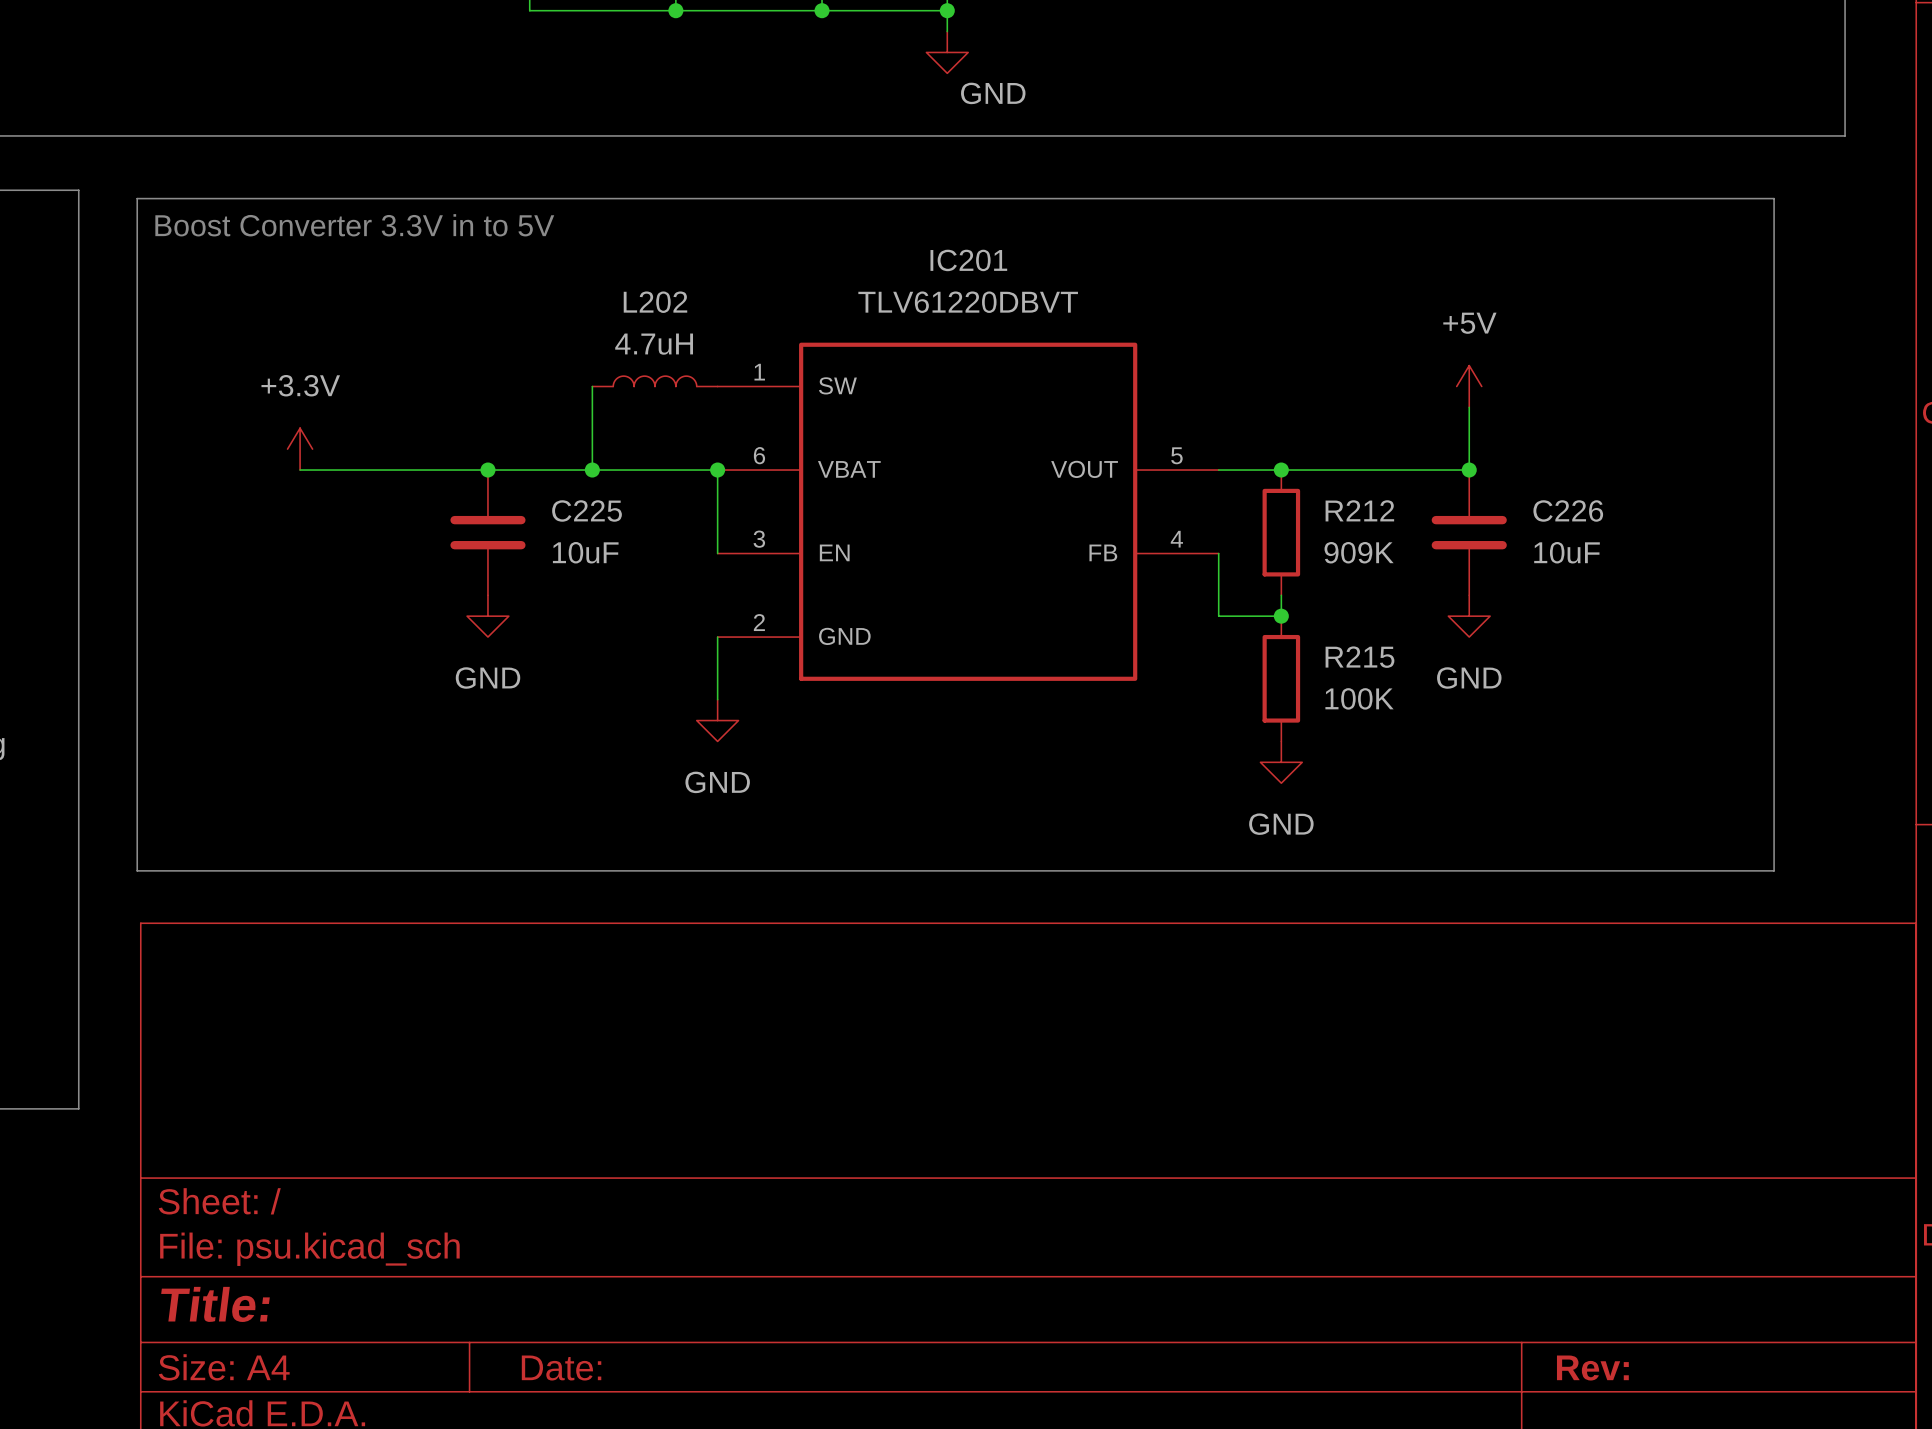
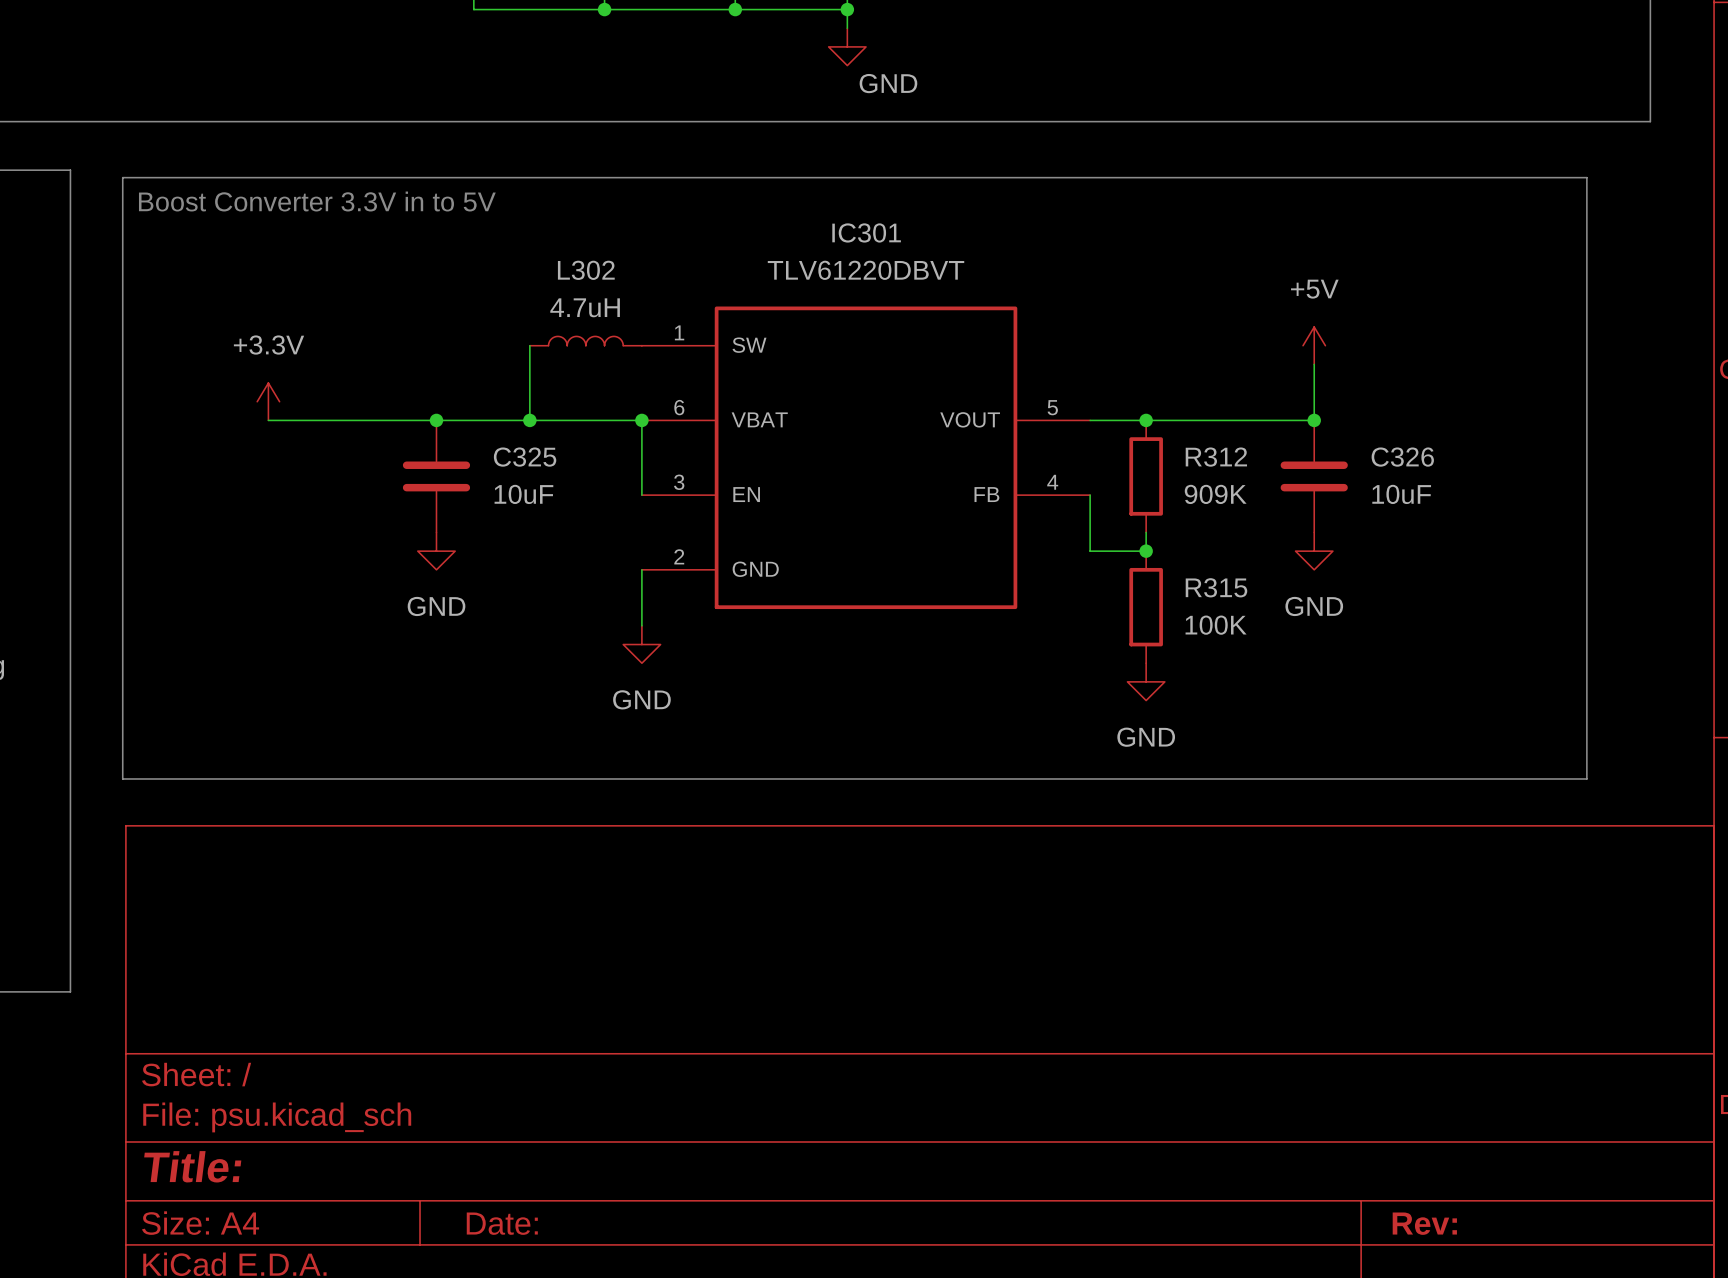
IC201 name: IC201 (968, 260) -> IC301 (866, 232)
L202 name: L202 (655, 302) -> L302 (586, 270)
C225 name: C225 (587, 510) -> C325 (525, 457)
R212 name: R212 (1359, 510) -> R312 (1216, 457)
C226 name: C226 (1568, 510) -> C326 (1402, 457)
R215 name: R215 (1359, 657) -> R315 (1216, 587)

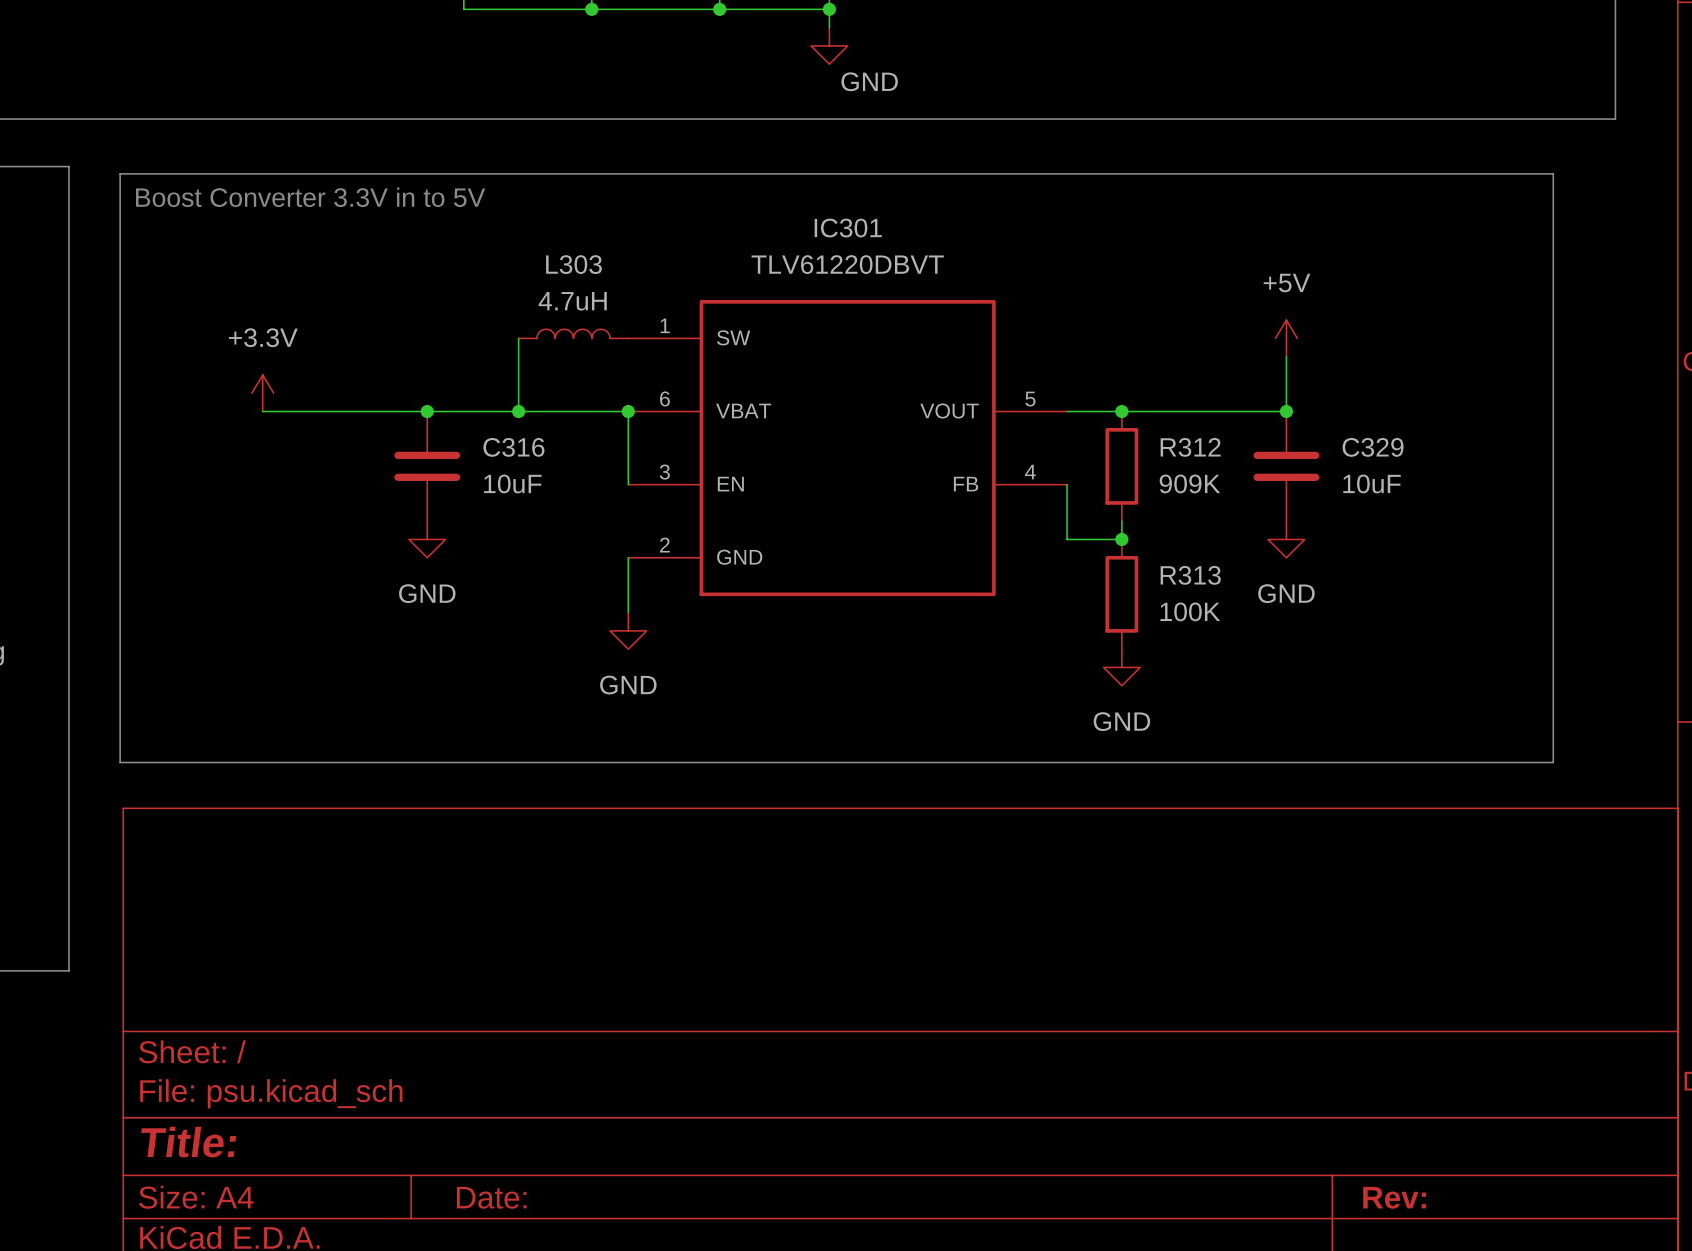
L302 name: L302 (586, 270) -> L303 (573, 264)
C325 name: C325 (525, 457) -> C316 (513, 447)
C326 name: C326 (1402, 457) -> C329 (1373, 447)
R315 name: R315 (1216, 587) -> R313 (1190, 575)

